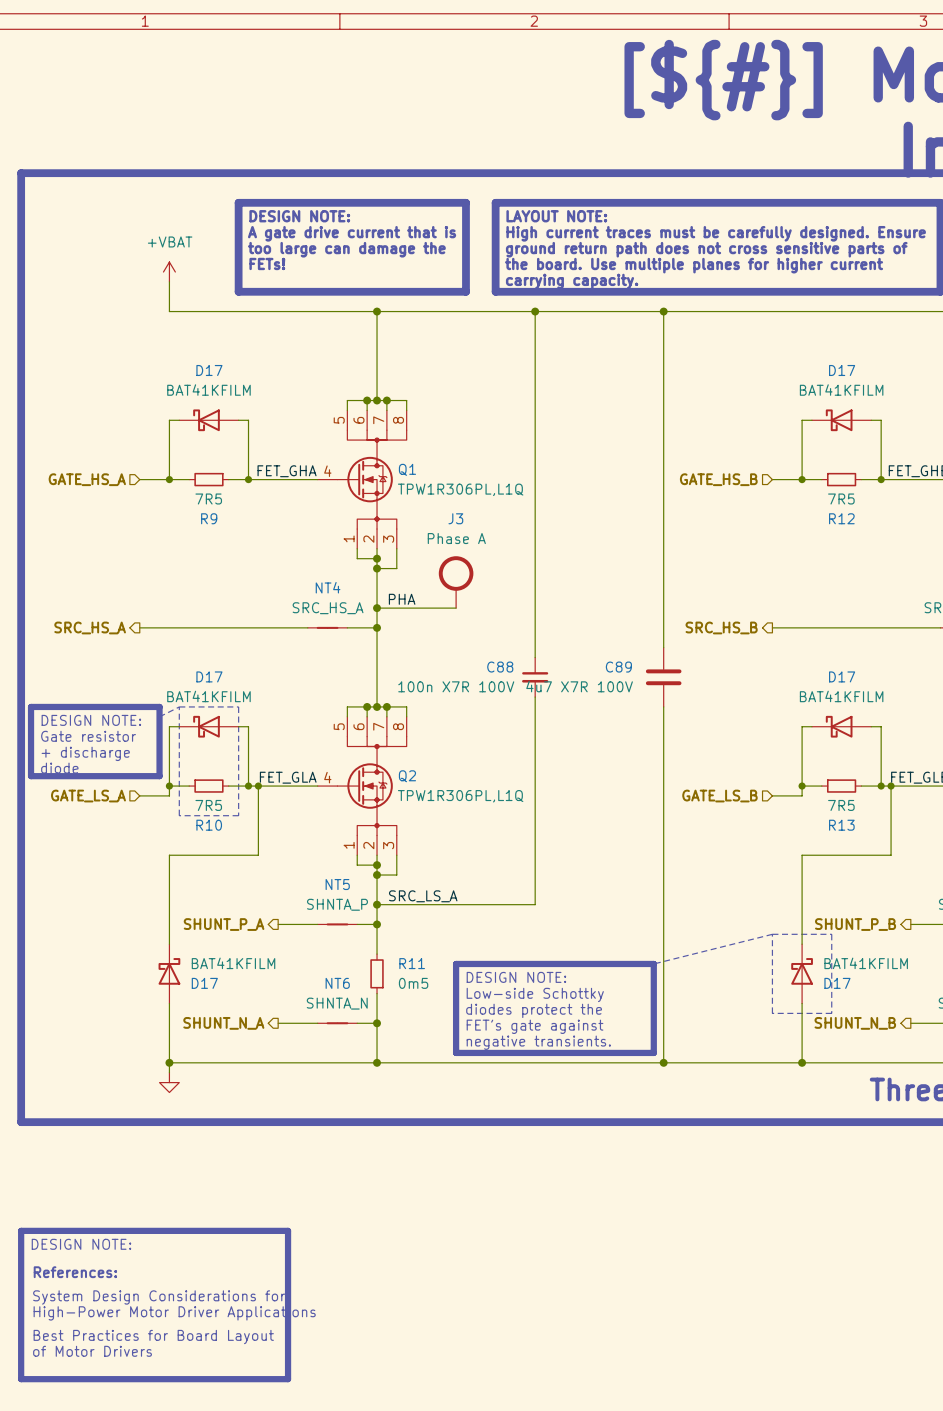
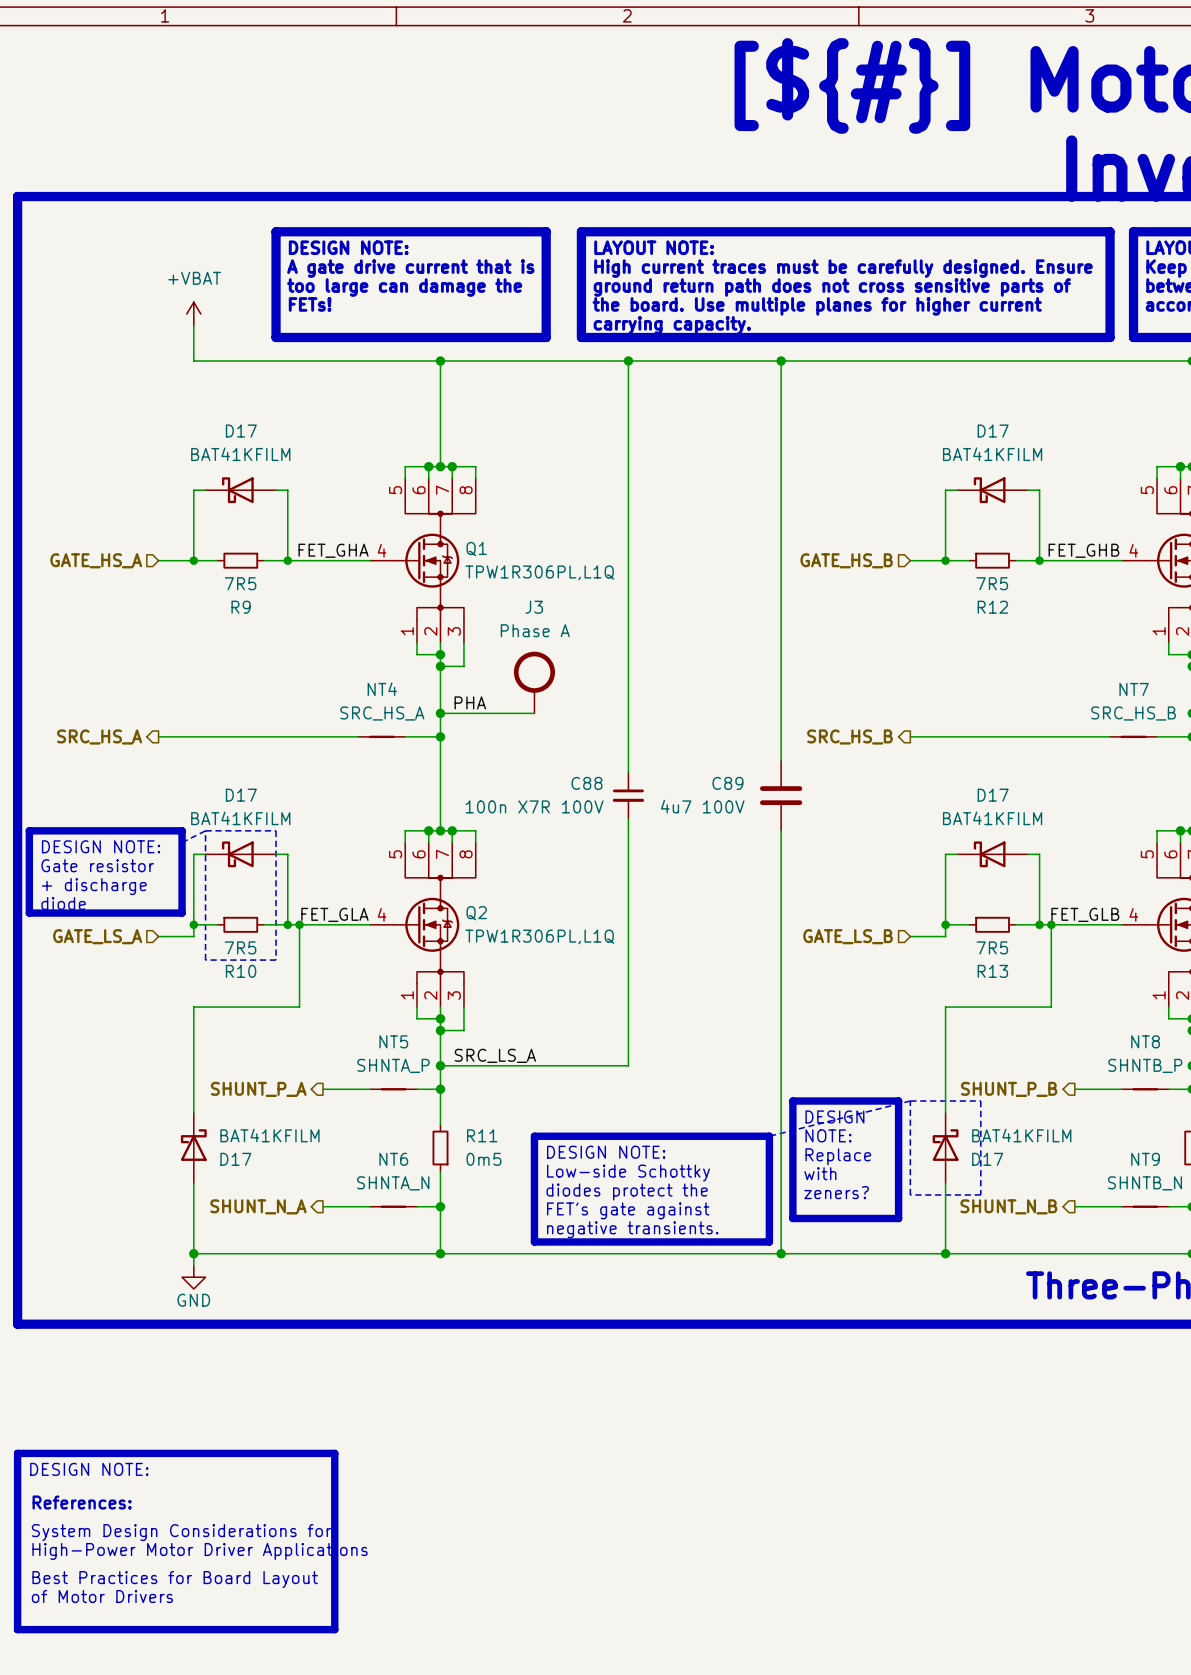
C89 value: 4u7 X7R 100V (579, 686) -> 4u7 100V (702, 806)
line: none -> (792, 1101) (898, 1101) (898, 1218) (792, 1218) (792, 1101)
text: none -> DESIGN (834, 1116)
text: none -> NOTE: (828, 1135)
text: none -> Replace (838, 1156)
text: none -> with (820, 1173)
text: none -> zeners? (836, 1192)
power symbol text: none -> GND (193, 1300)

